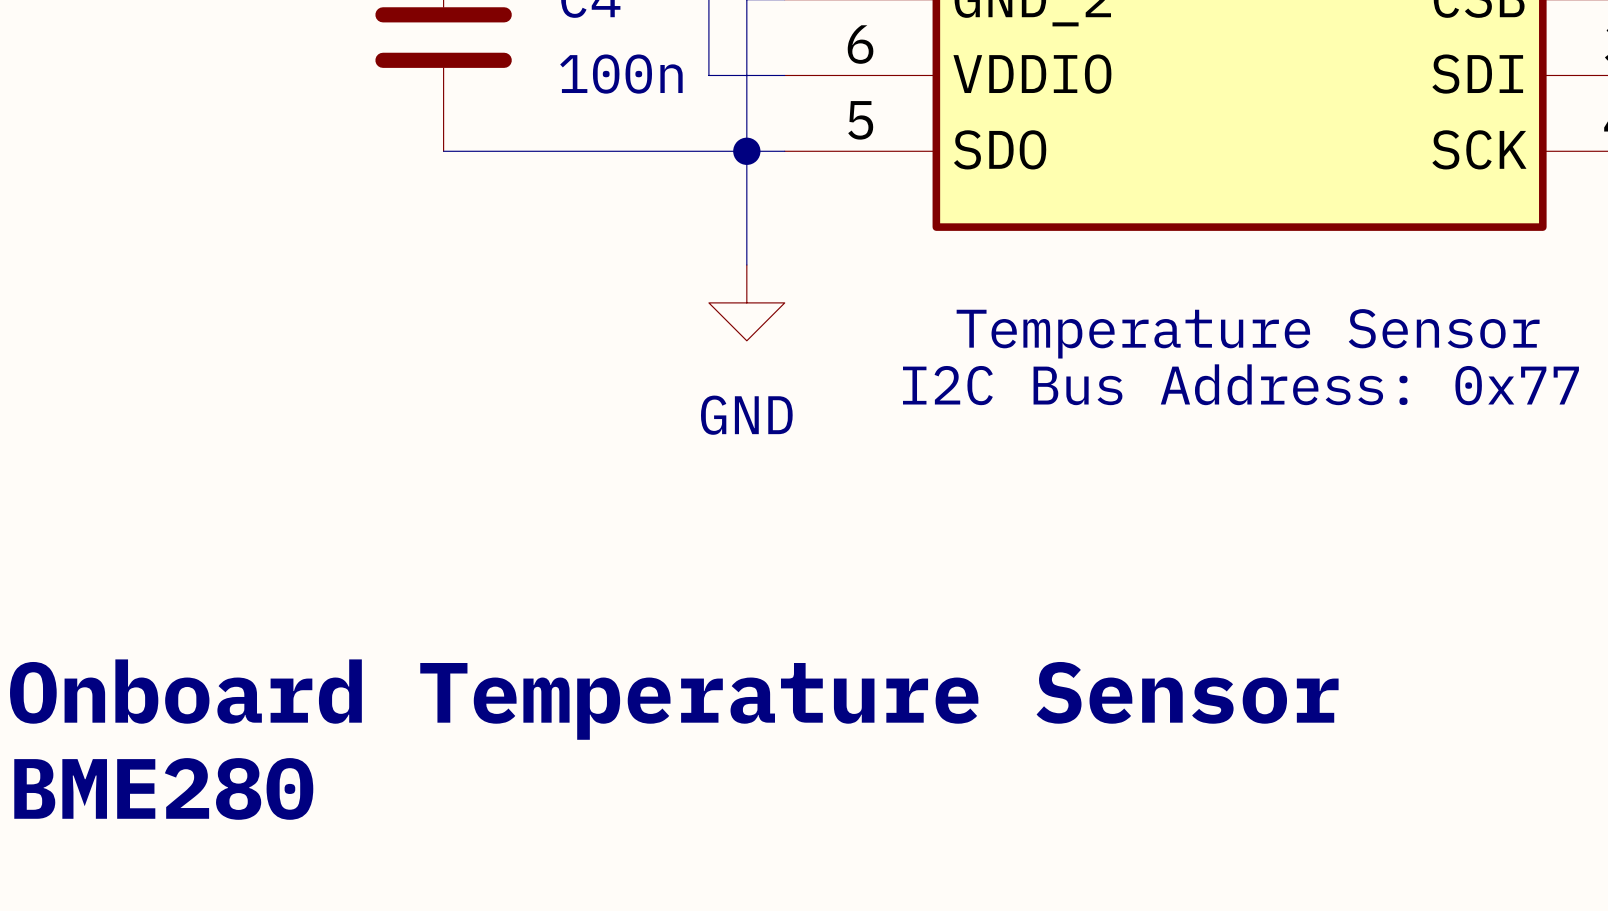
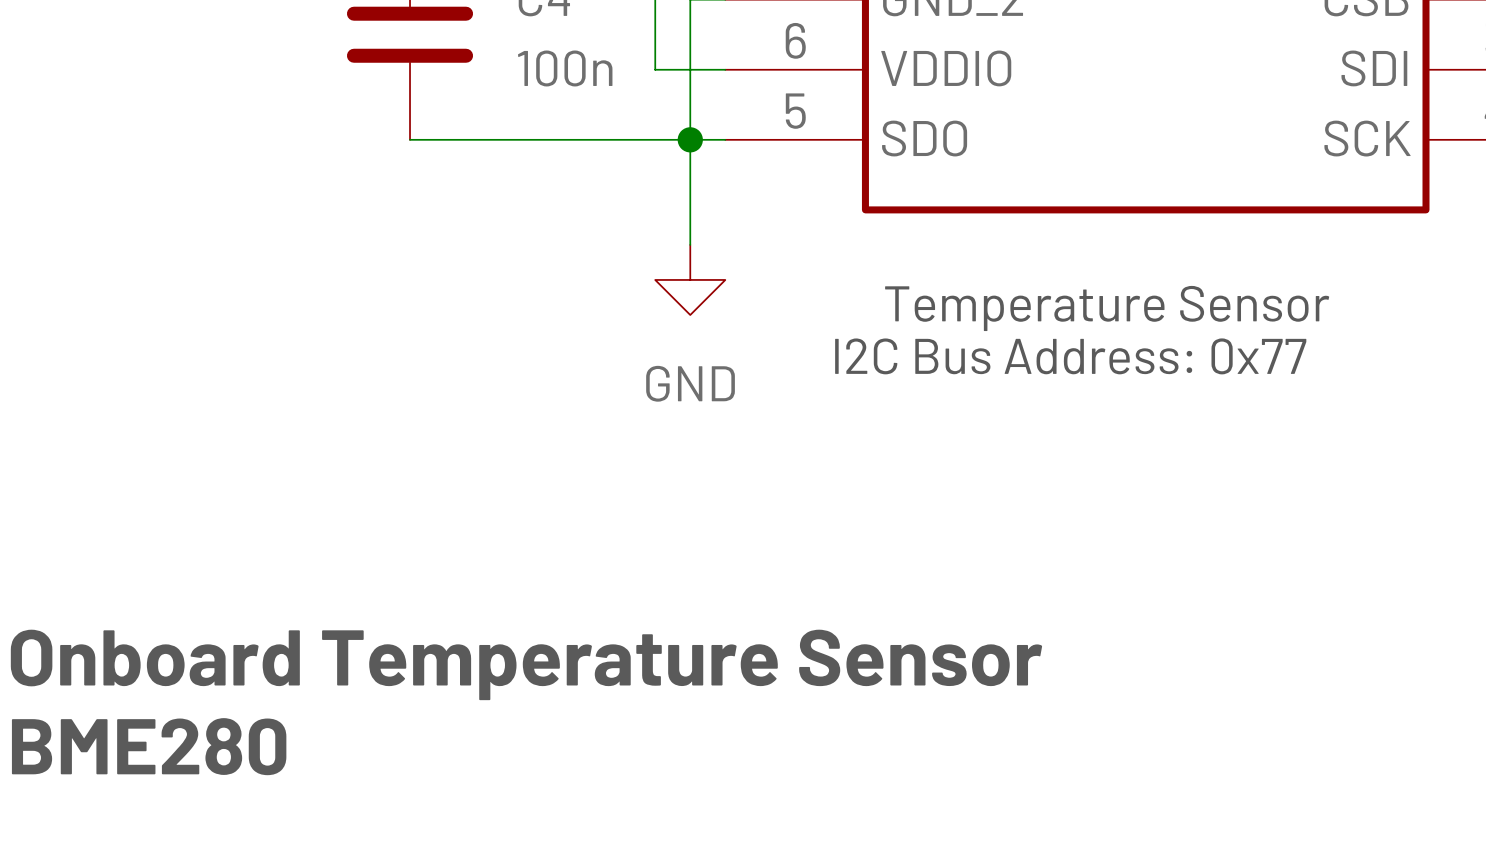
text position: Onboard Temperature Sensor (674, 699) -> Onboard Temperature Sensor (526, 664)
text position: BME280 (163, 788) -> BME280 (149, 746)

